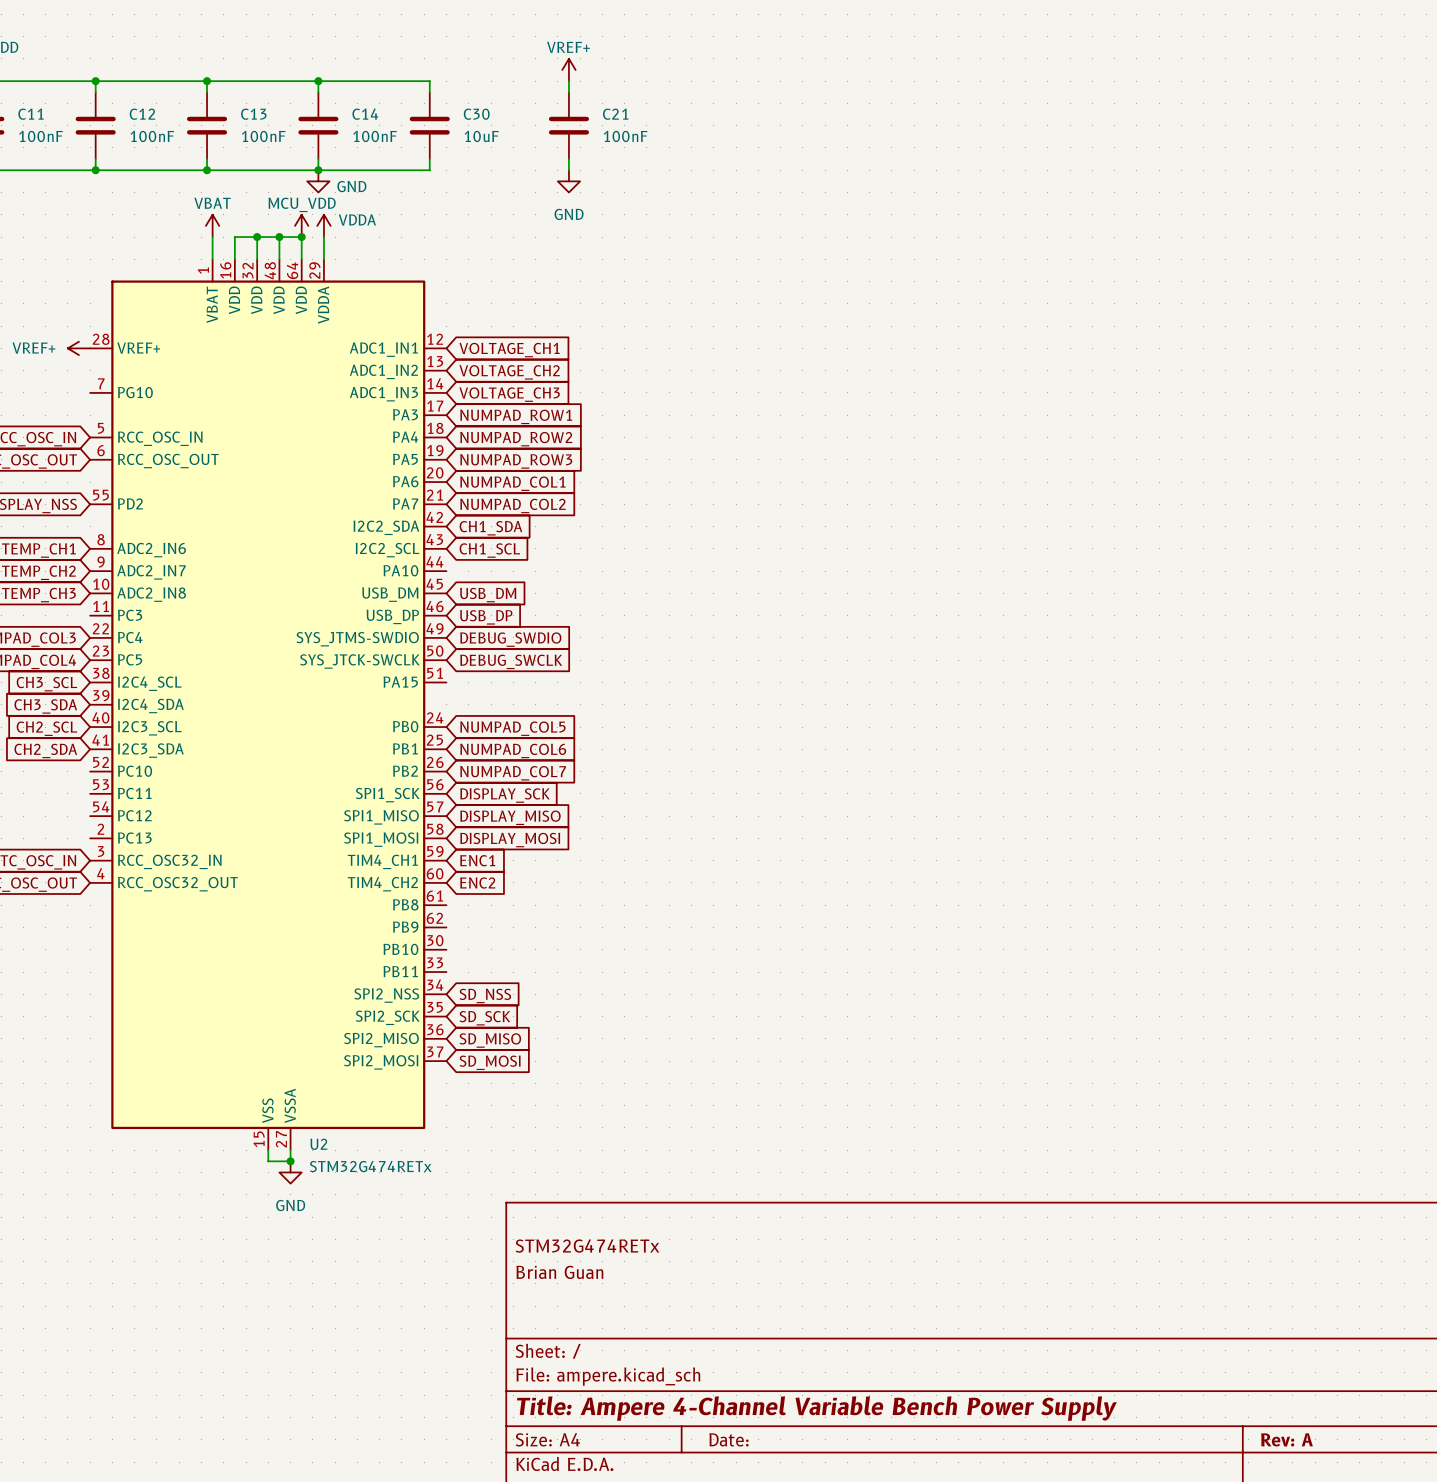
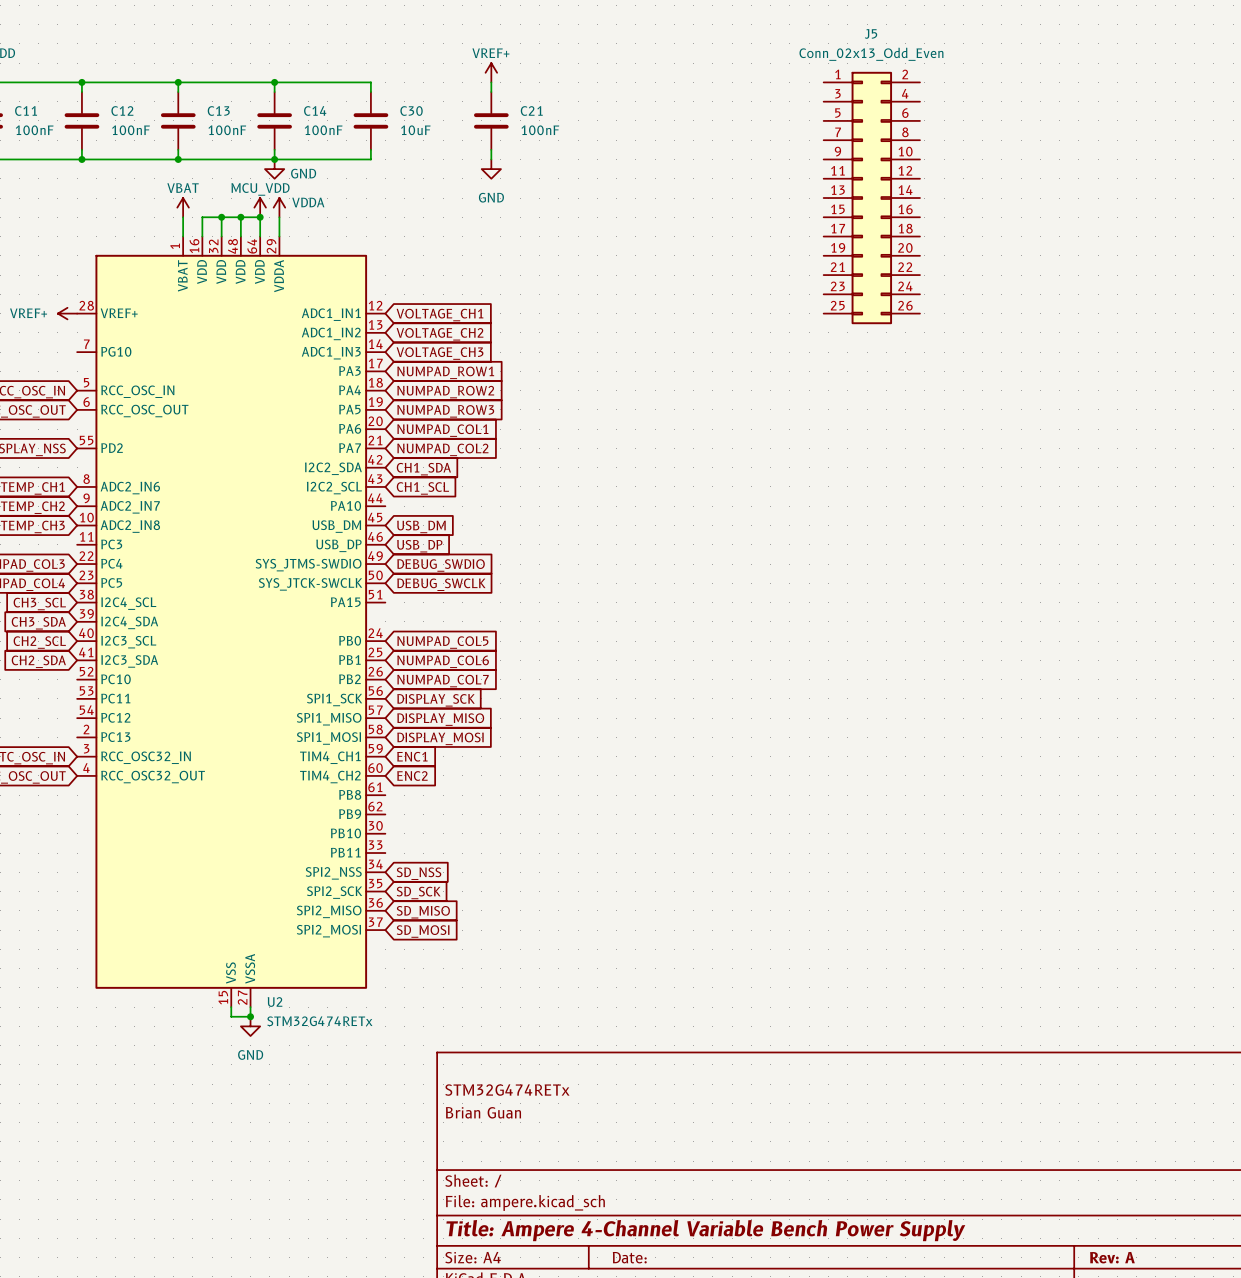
J5: none -> Conn_02x13_Odd_Even (871, 198)

